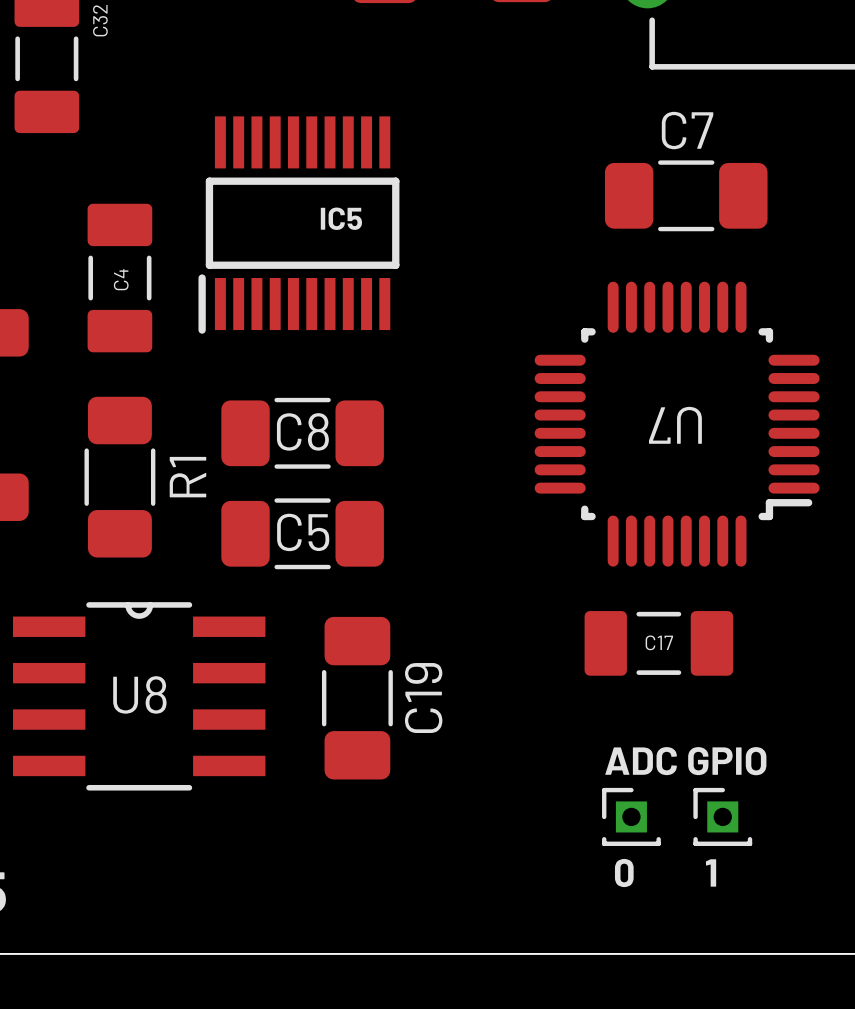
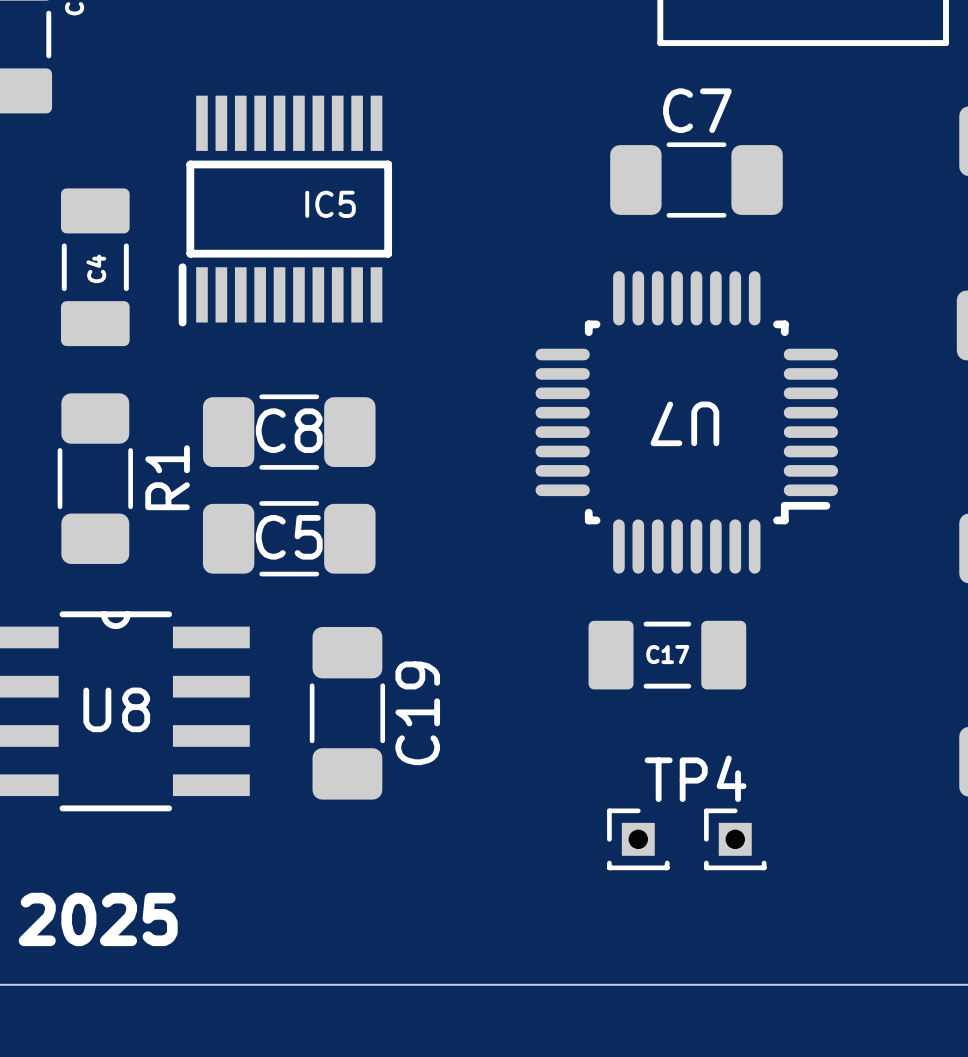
ADC GPIO name: ADC GPIO (685, 761) -> TP4 (695, 778)
text: 1 (711, 872) -> none
text: 0 (624, 873) -> none

